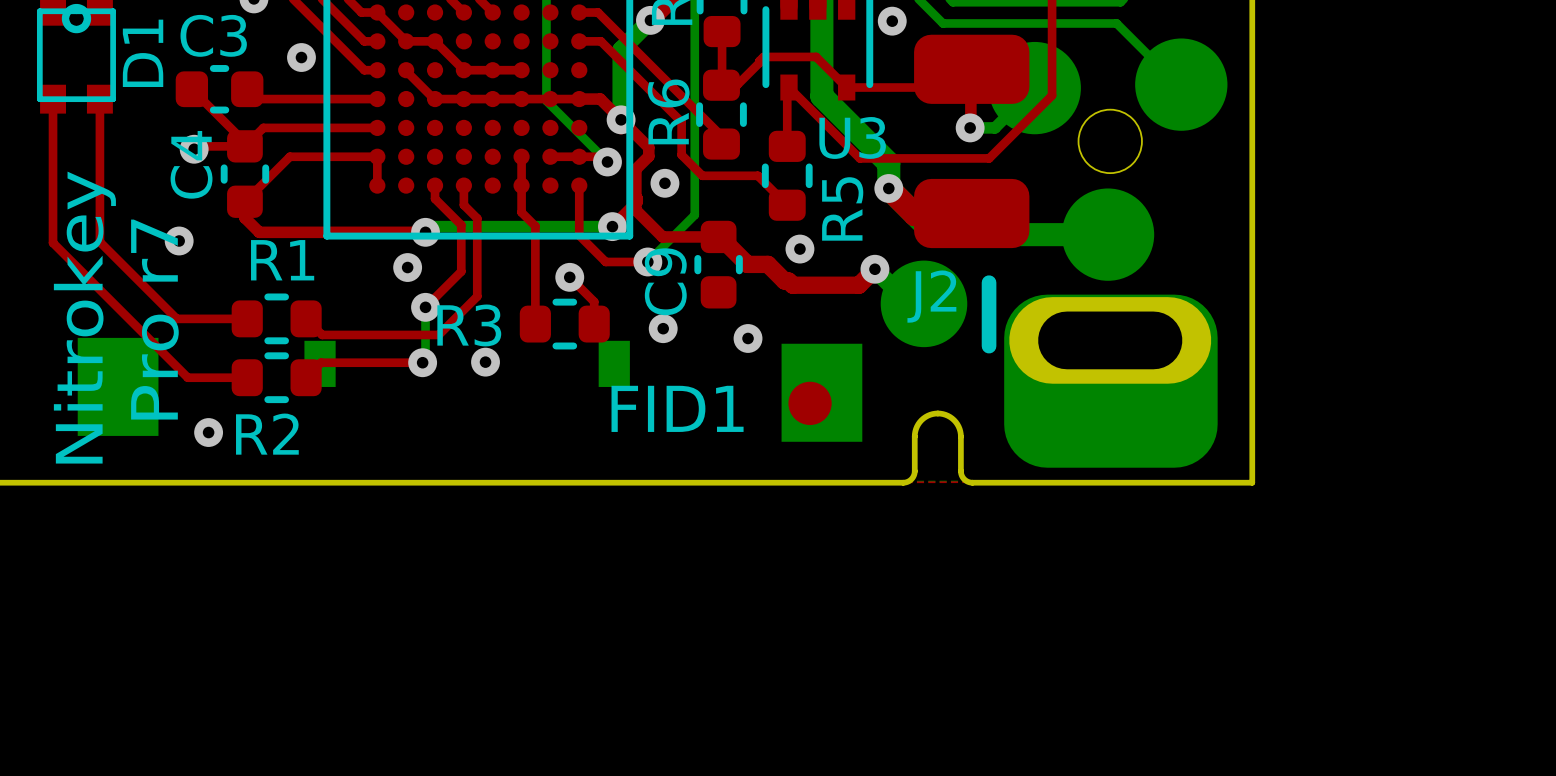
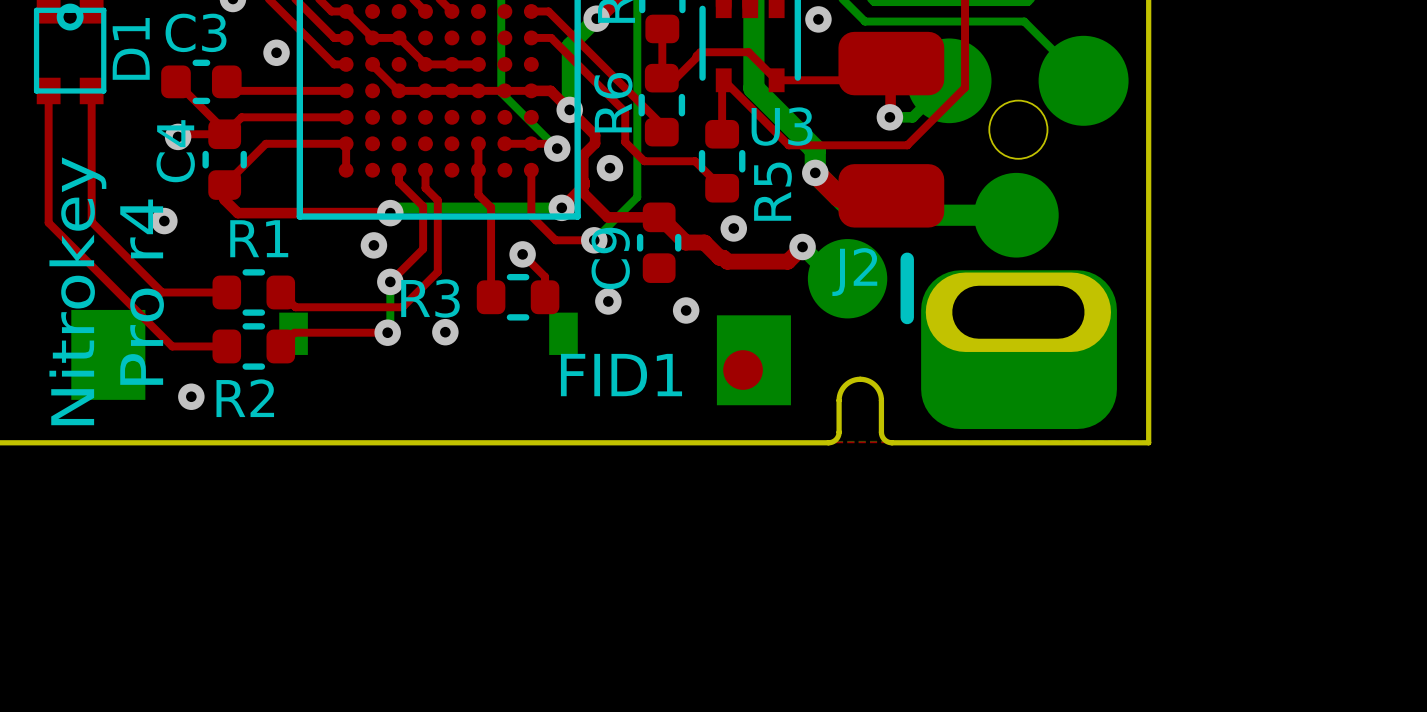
part footprint: [1135, 38, 1228, 131] -> [1038, 35, 1129, 126]
text: Pro r7 (154, 319) -> Pro r4 (142, 292)

